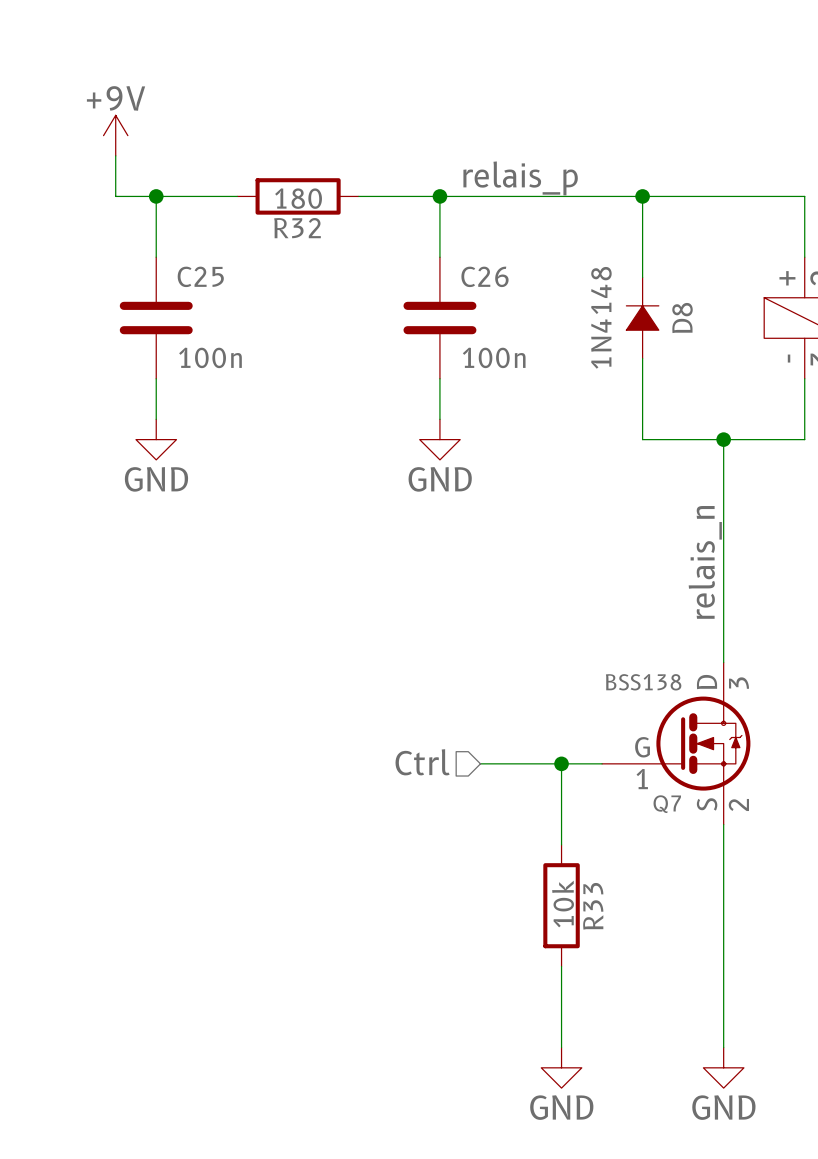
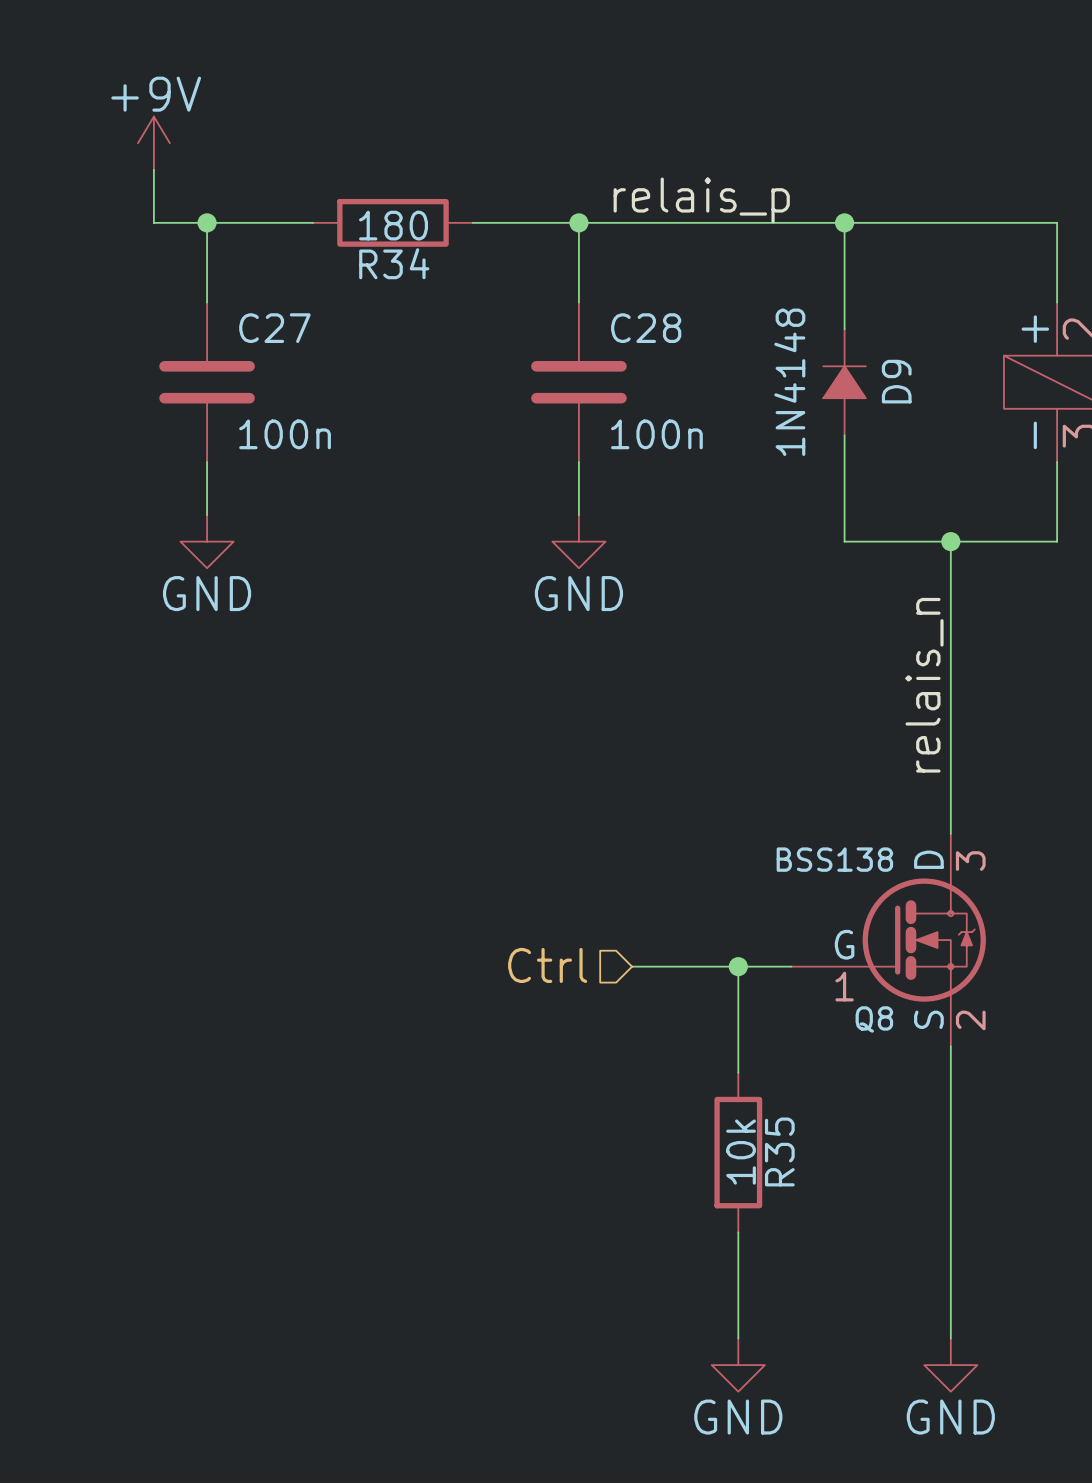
R32 name: R32 (297, 228) -> R34 (394, 263)
C25 name: C25 (200, 276) -> C27 (274, 328)
C26 name: C26 (484, 276) -> C28 (646, 328)
D8 name: D8 (682, 318) -> D9 (896, 381)
Q7 name: Q7 (667, 804) -> Q8 (874, 1019)
R33 name: R33 (593, 906) -> R35 (779, 1151)

